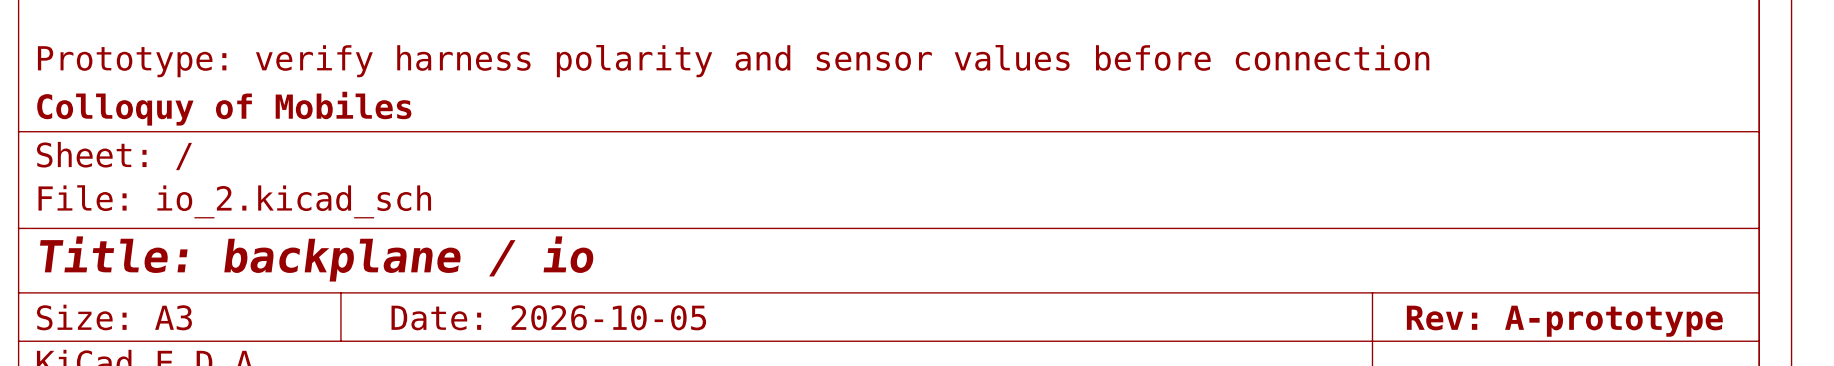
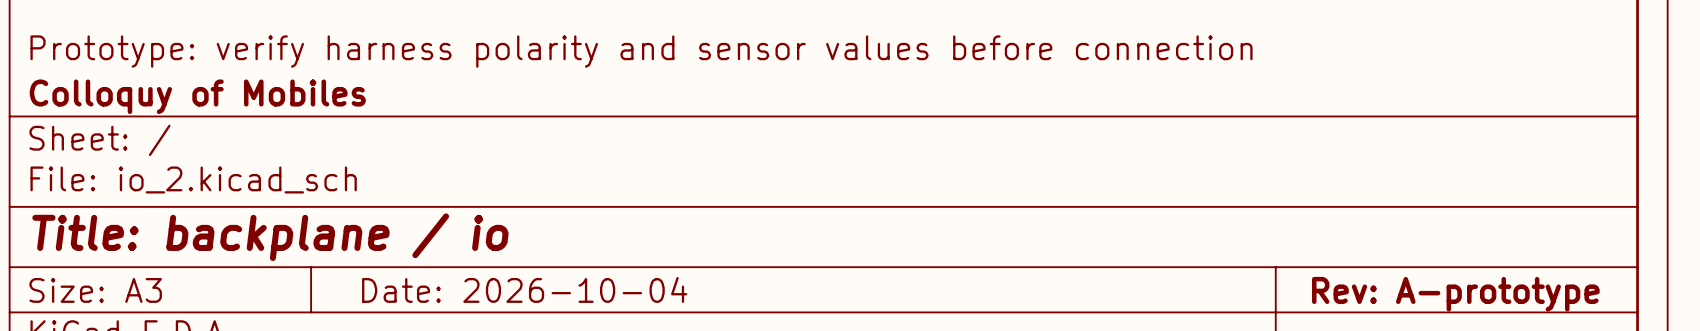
title block: Date: 2026-10-05 (548, 317) -> Date: 2026-10-04 (524, 289)

